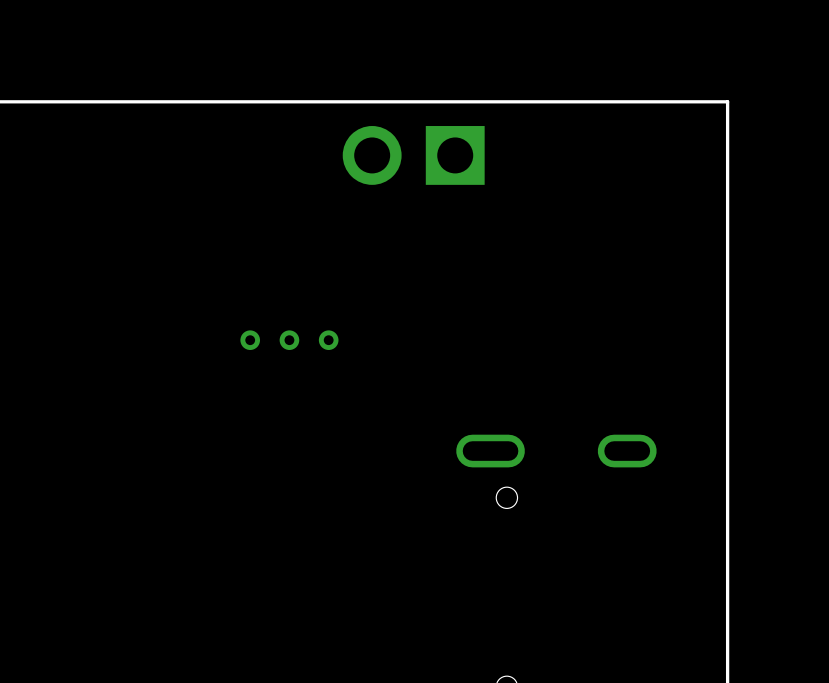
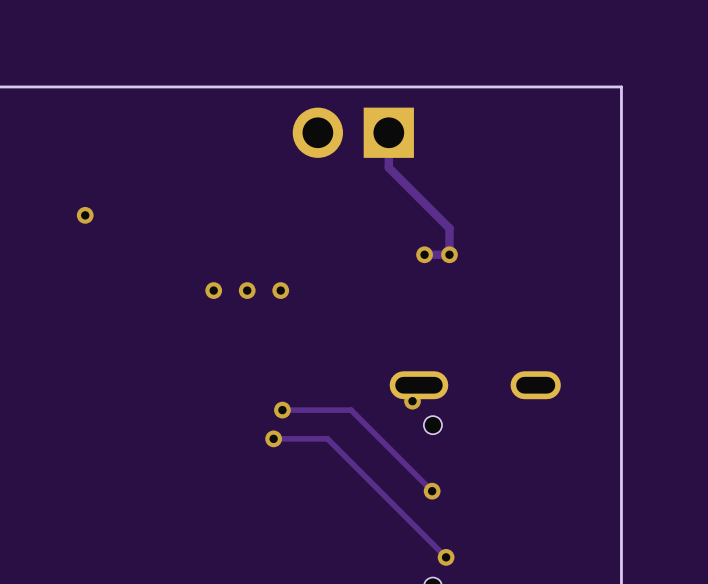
track: none -> (388, 132) (388, 167) (449, 228) (449, 254) (424, 254)
via: none -> (85, 215)
via: none -> (424, 254)
via: none -> (449, 254)
via: none -> (412, 401)
track: none -> (282, 410) (351, 410) (432, 491)
via: none -> (282, 410)
track: none -> (273, 438) (327, 438) (446, 557)
via: none -> (273, 438)
via: none -> (432, 491)
via: none -> (446, 557)

